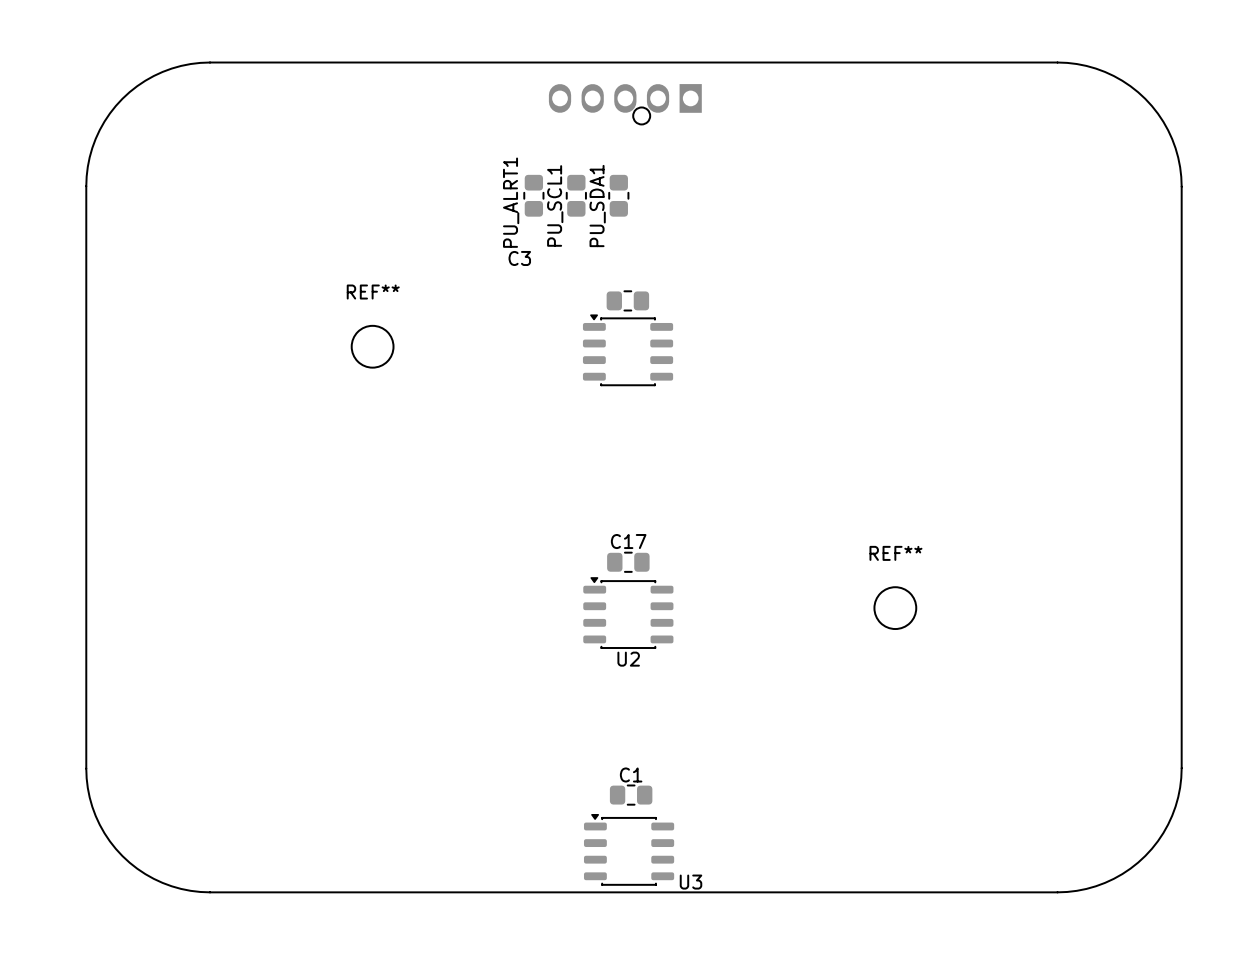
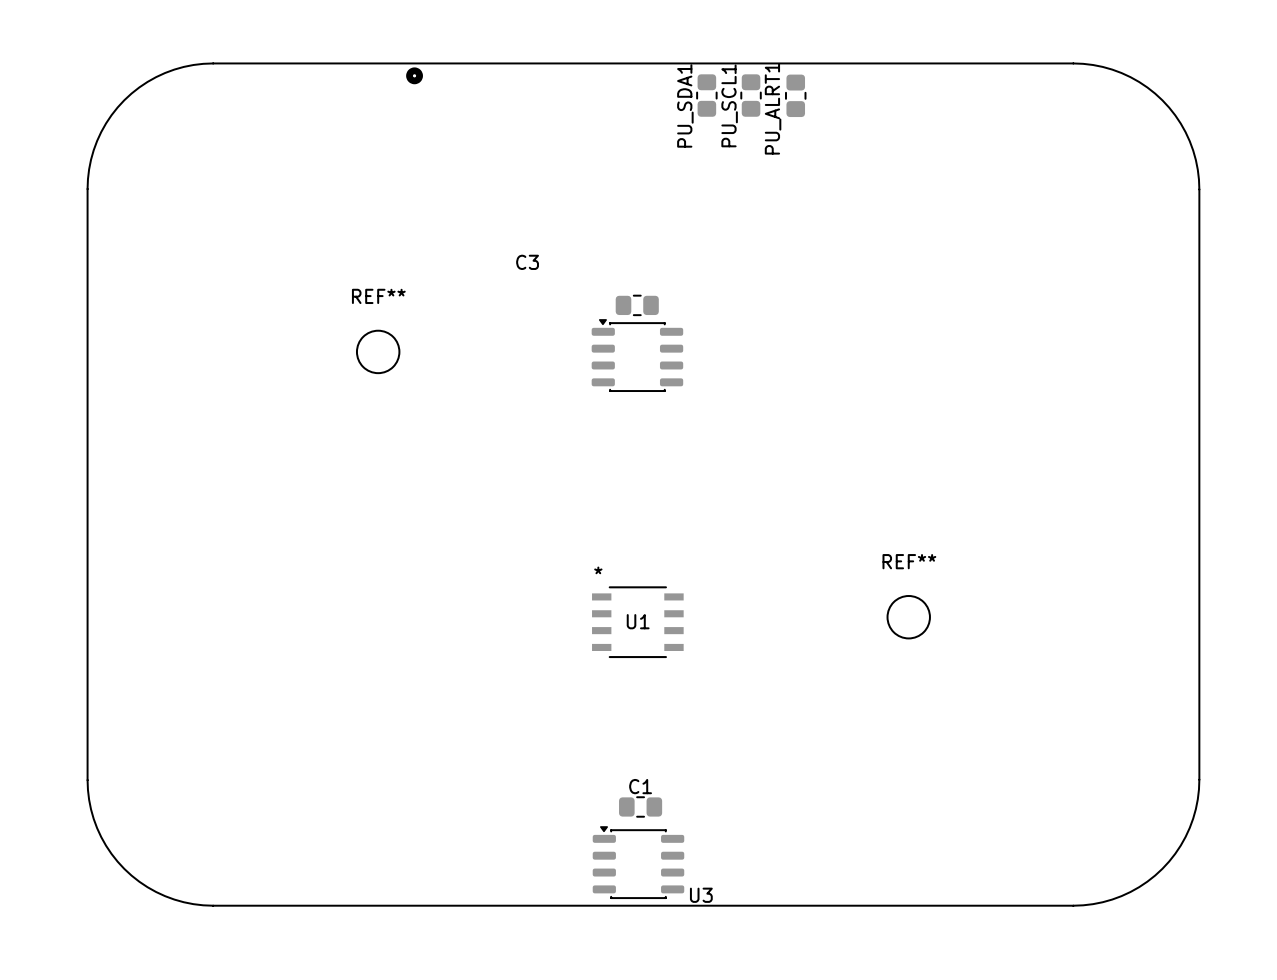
part: none -> (414, 75)
part: (625, 104) -> none
PU_ALRT1 position: (533, 195) -> (795, 95)
PU_SCL1 position: (576, 195) -> (751, 95)
PU_SDA1 position: (618, 195) -> (706, 95)
PU_ALRT1 name position: PU_ALRT1 (511, 202) -> PU_ALRT1 (773, 108)
C17: (628, 562) -> none
U2: (628, 612) -> none
U1: none -> (637, 622)

